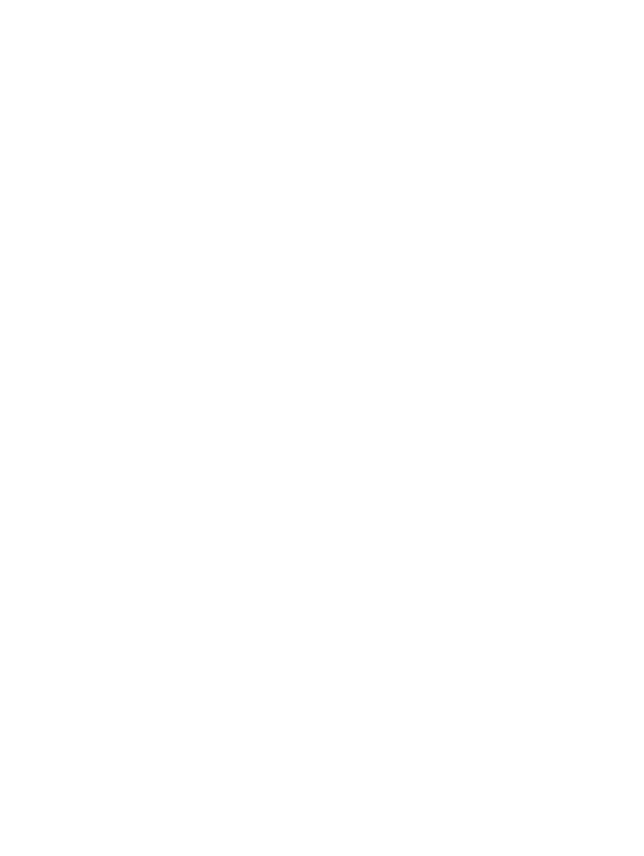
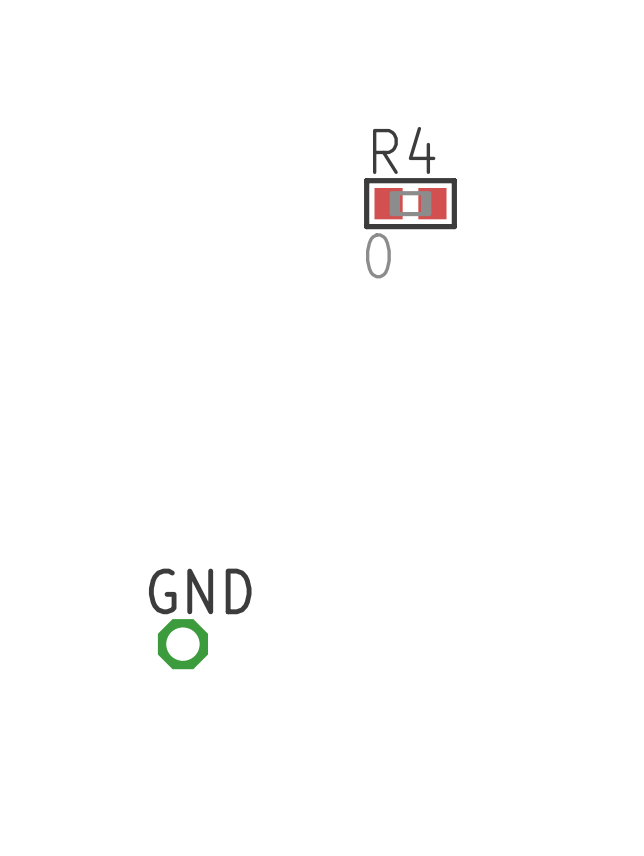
R4: none -> 0 (410, 203)
GND: none -> (182, 644)

